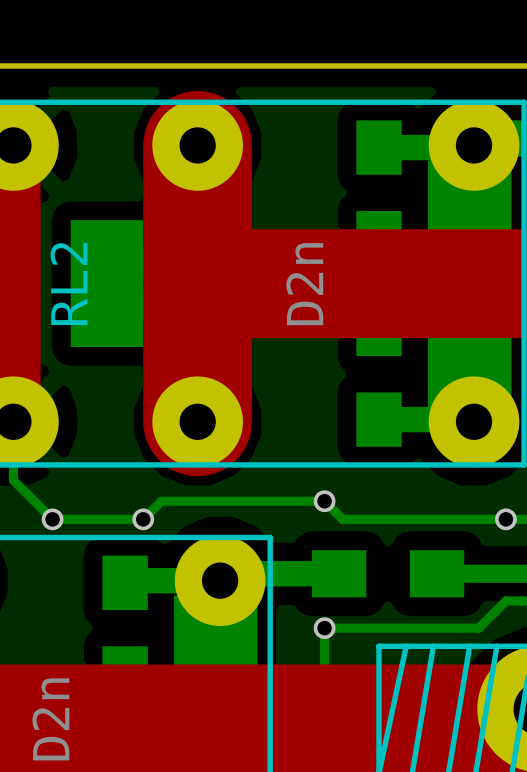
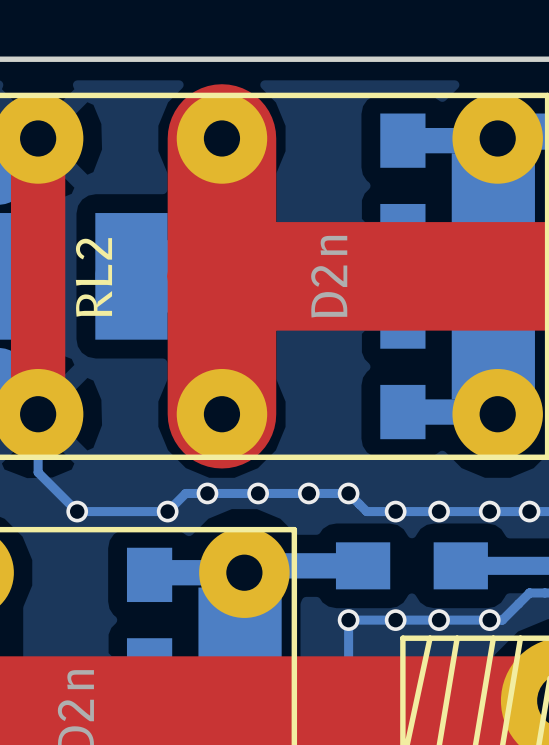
via: none -> (207, 493)
via: none -> (258, 493)
via: none -> (308, 493)
via: none -> (395, 511)
via: none -> (439, 511)
via: none -> (489, 511)
via: none -> (395, 620)
via: none -> (439, 620)
via: none -> (489, 620)

